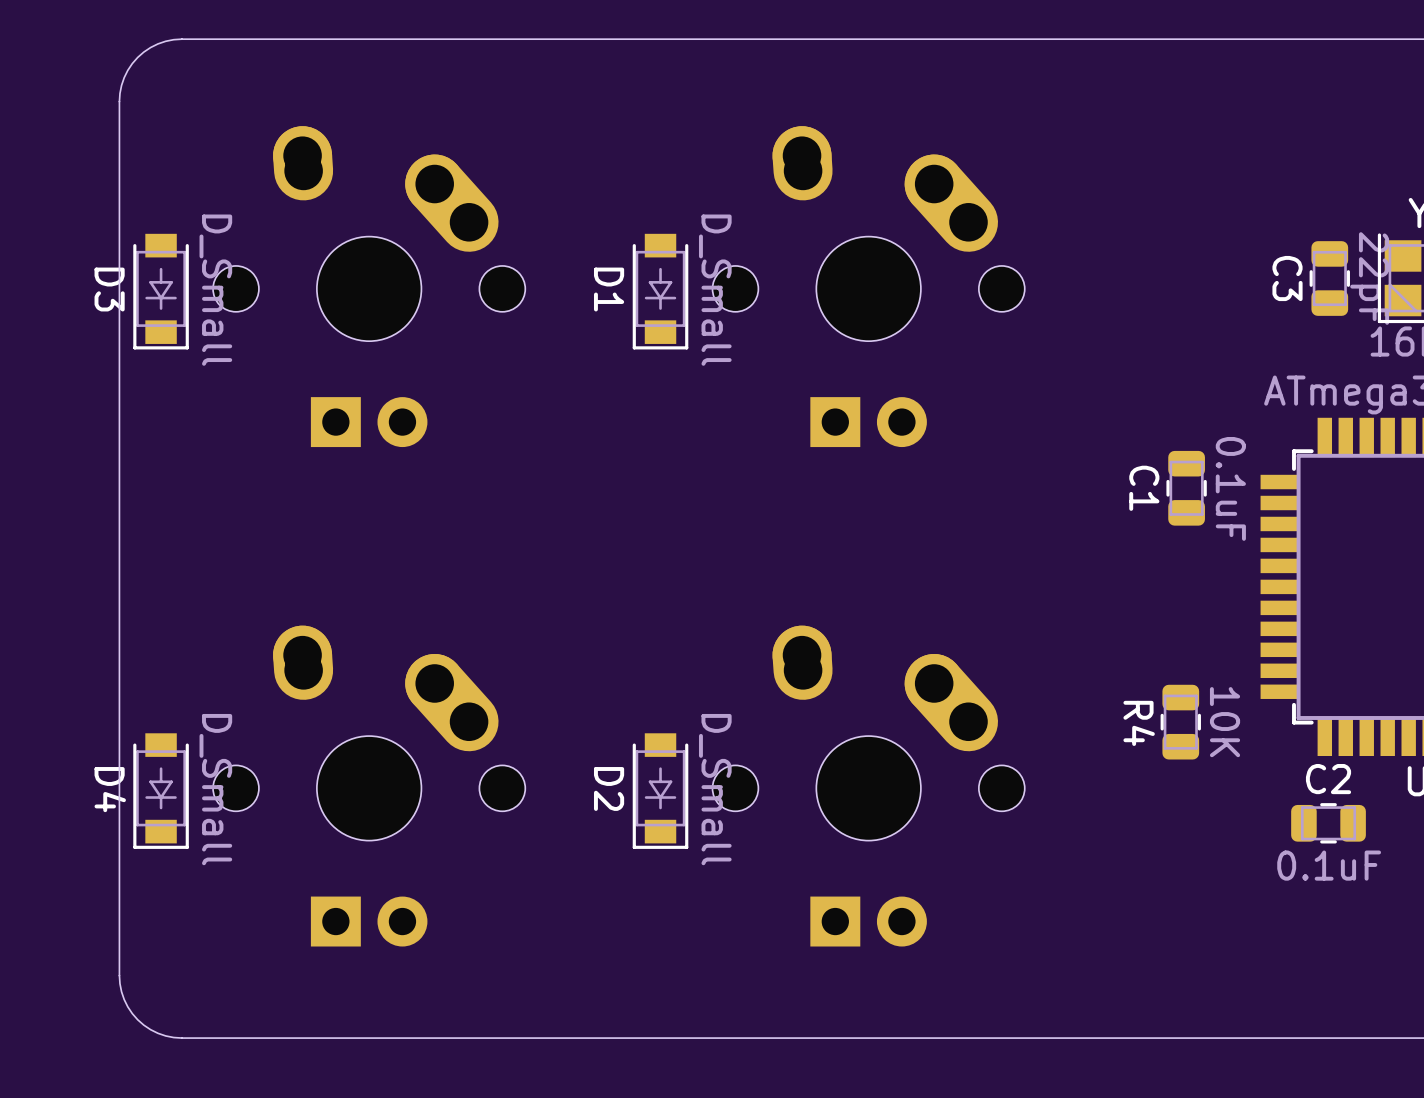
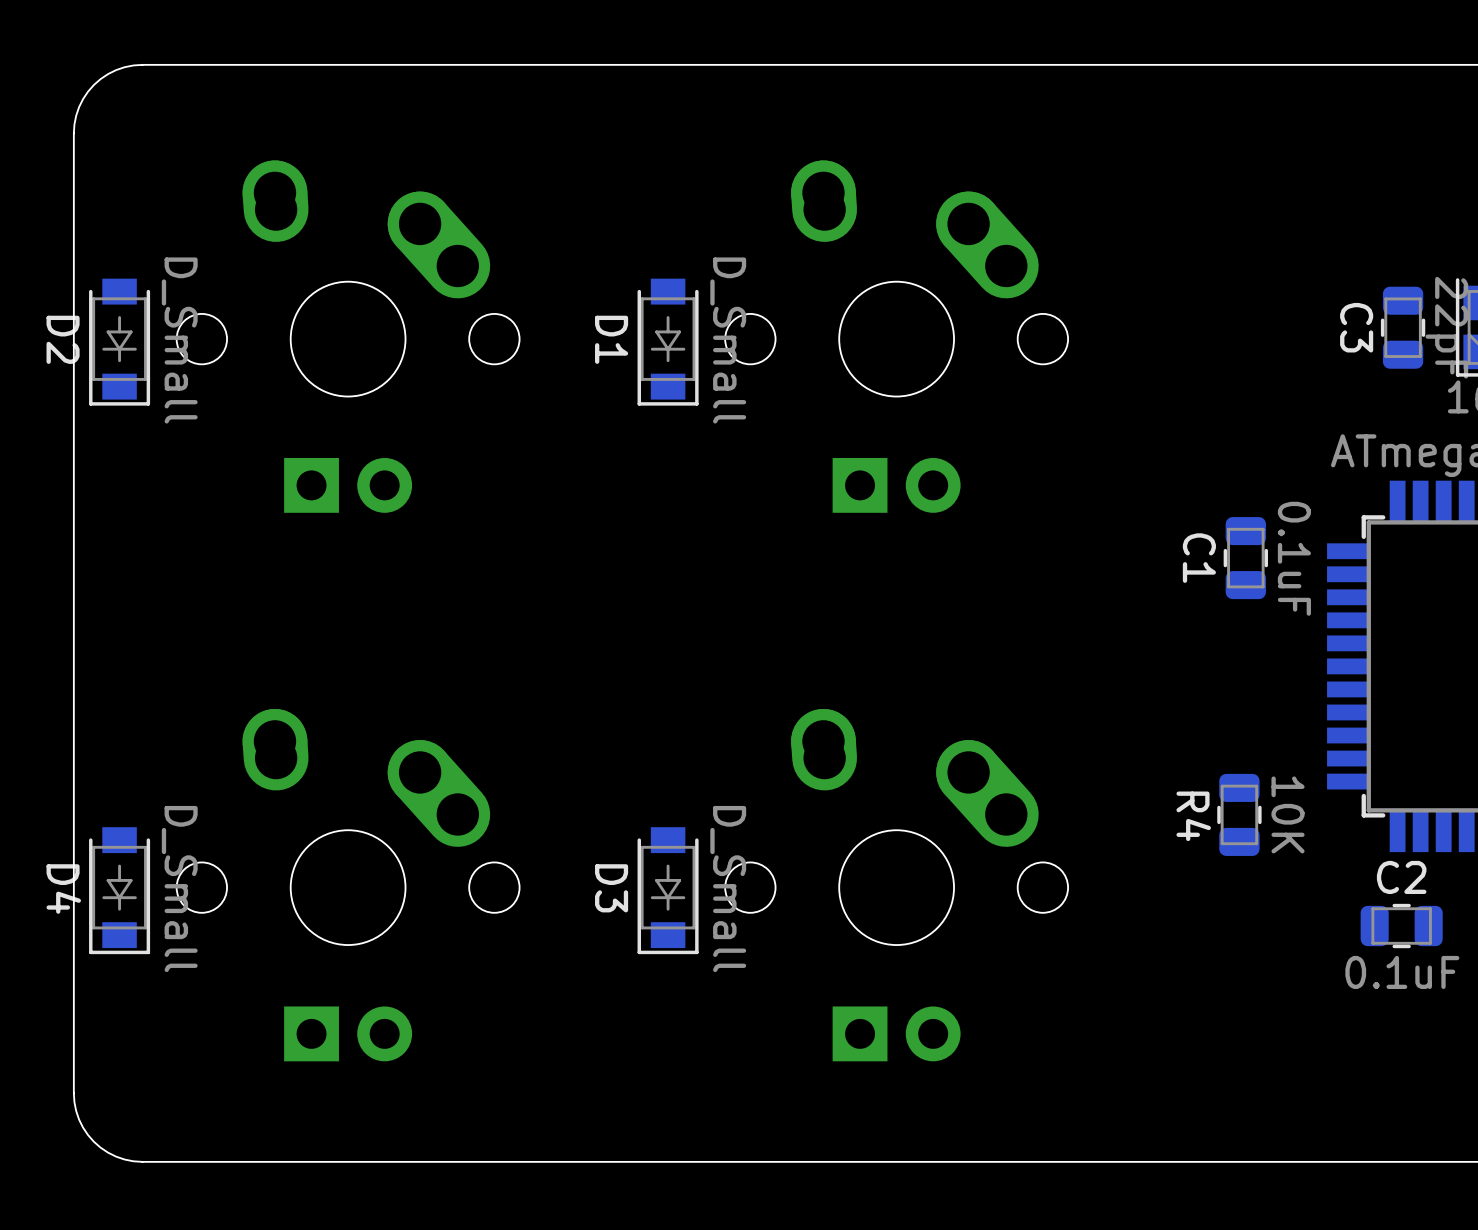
D3 name: D3 (109, 289) -> D2 (63, 339)
D2 name: D2 (609, 788) -> D3 (611, 888)

